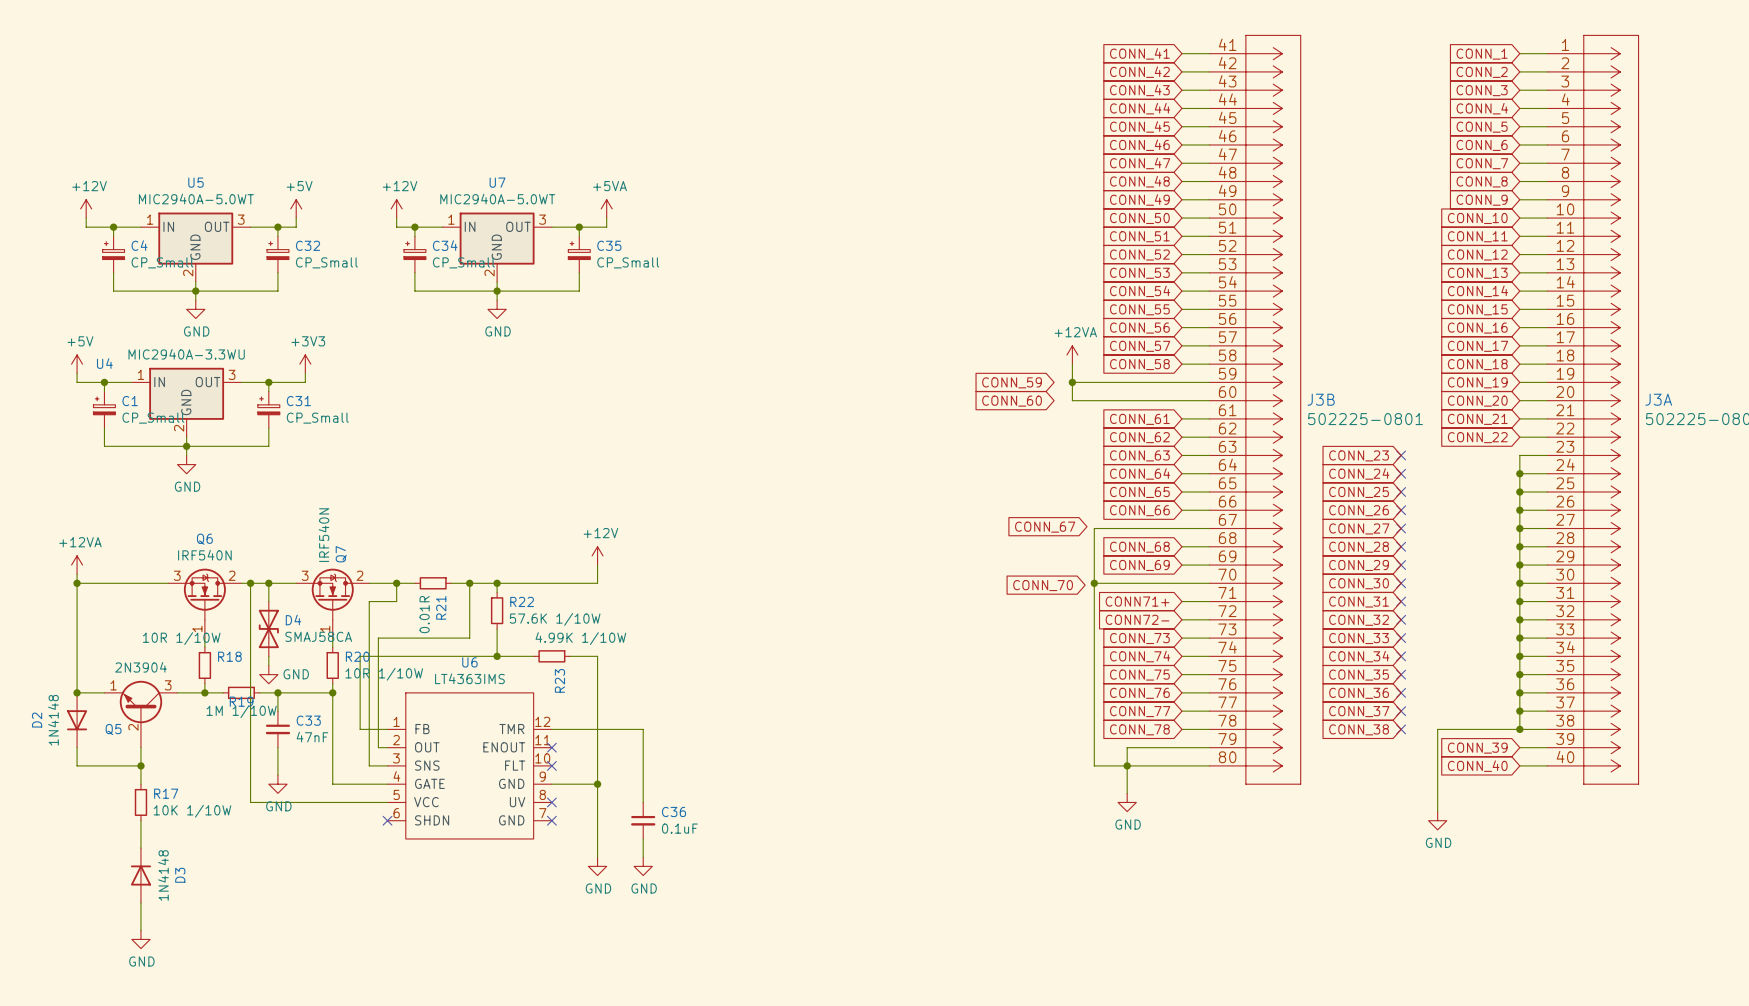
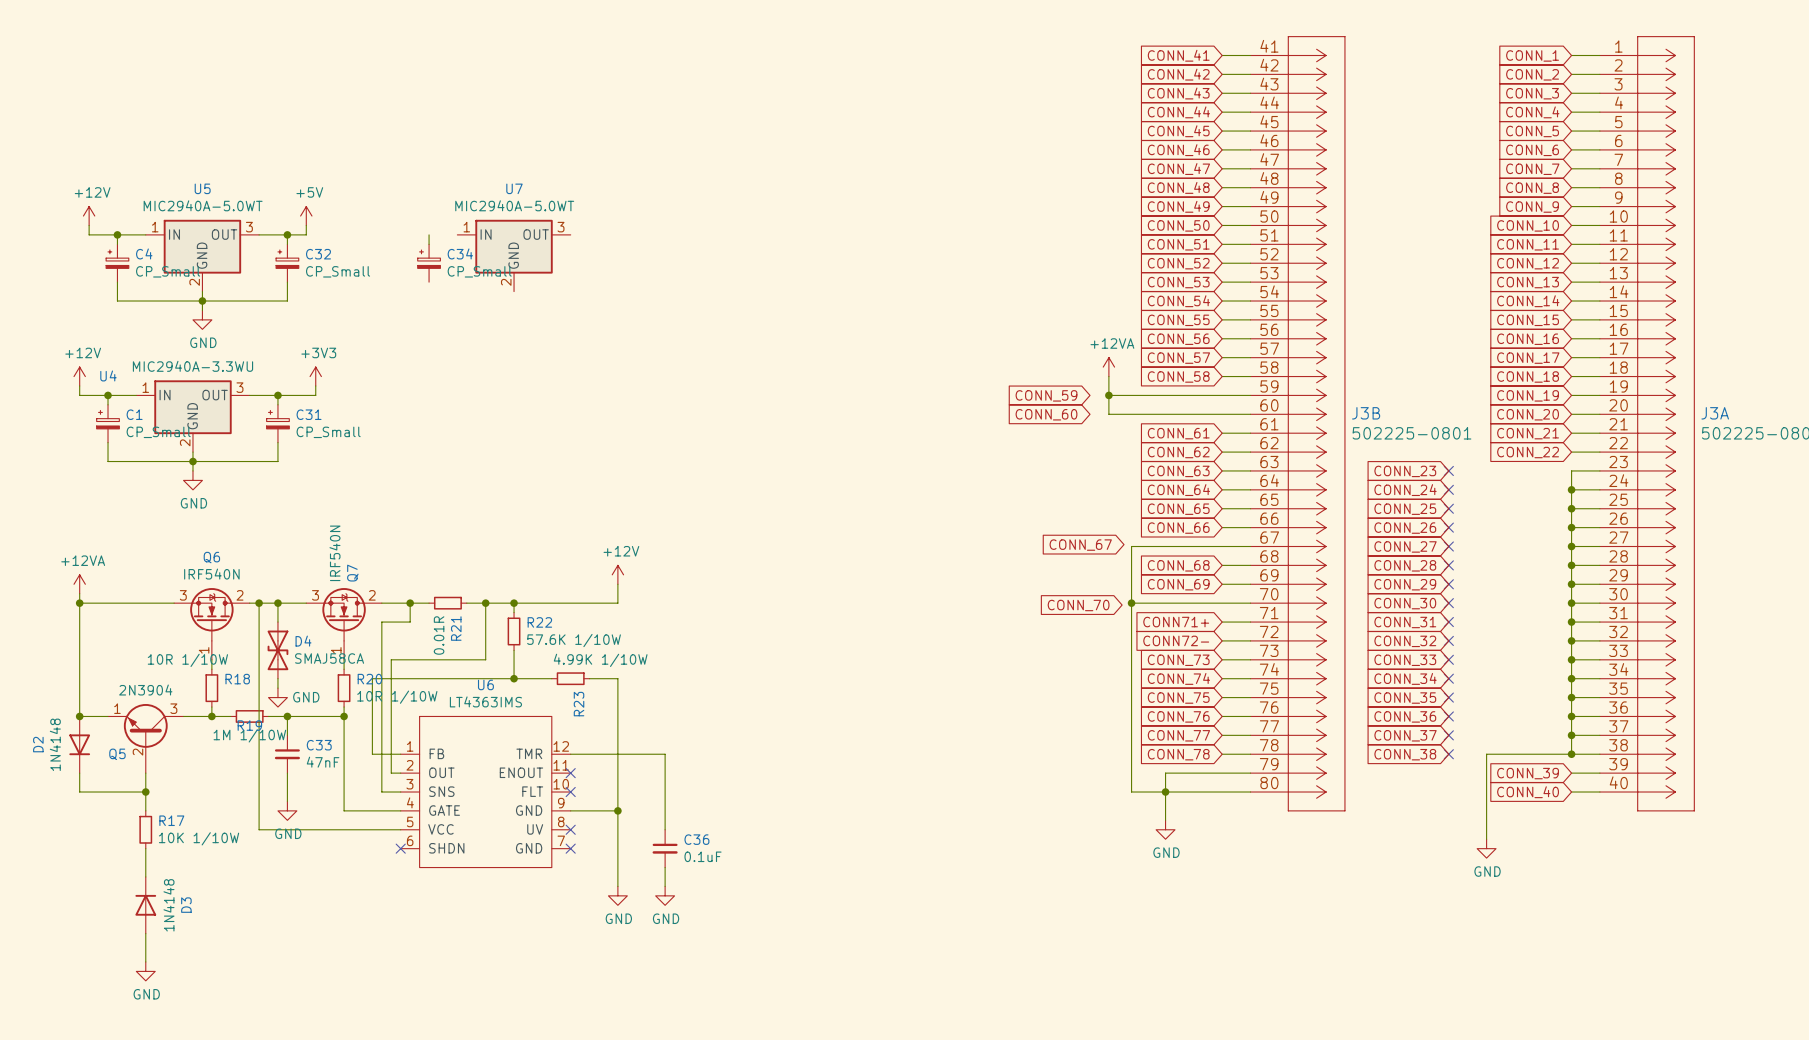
power symbol: +12V (396, 208) -> none
power symbol: +5VA (606, 208) -> none
wire: (396, 218) (396, 227) (442, 227) -> none
wire: (606, 218) (606, 227) (551, 227) -> none
junction: (414, 227) -> none
wire: (579, 227) (579, 236) -> none
junction: (579, 227) -> none
C35: CP_Small (579, 254) -> none
wire: (414, 272) (414, 291) (579, 291) (579, 272) -> none
wire: (497, 281) (497, 300) -> none
junction: (497, 291) -> none
power symbol: GND (497, 309) -> none
power symbol: +5V (77, 364) -> +12V (79, 376)

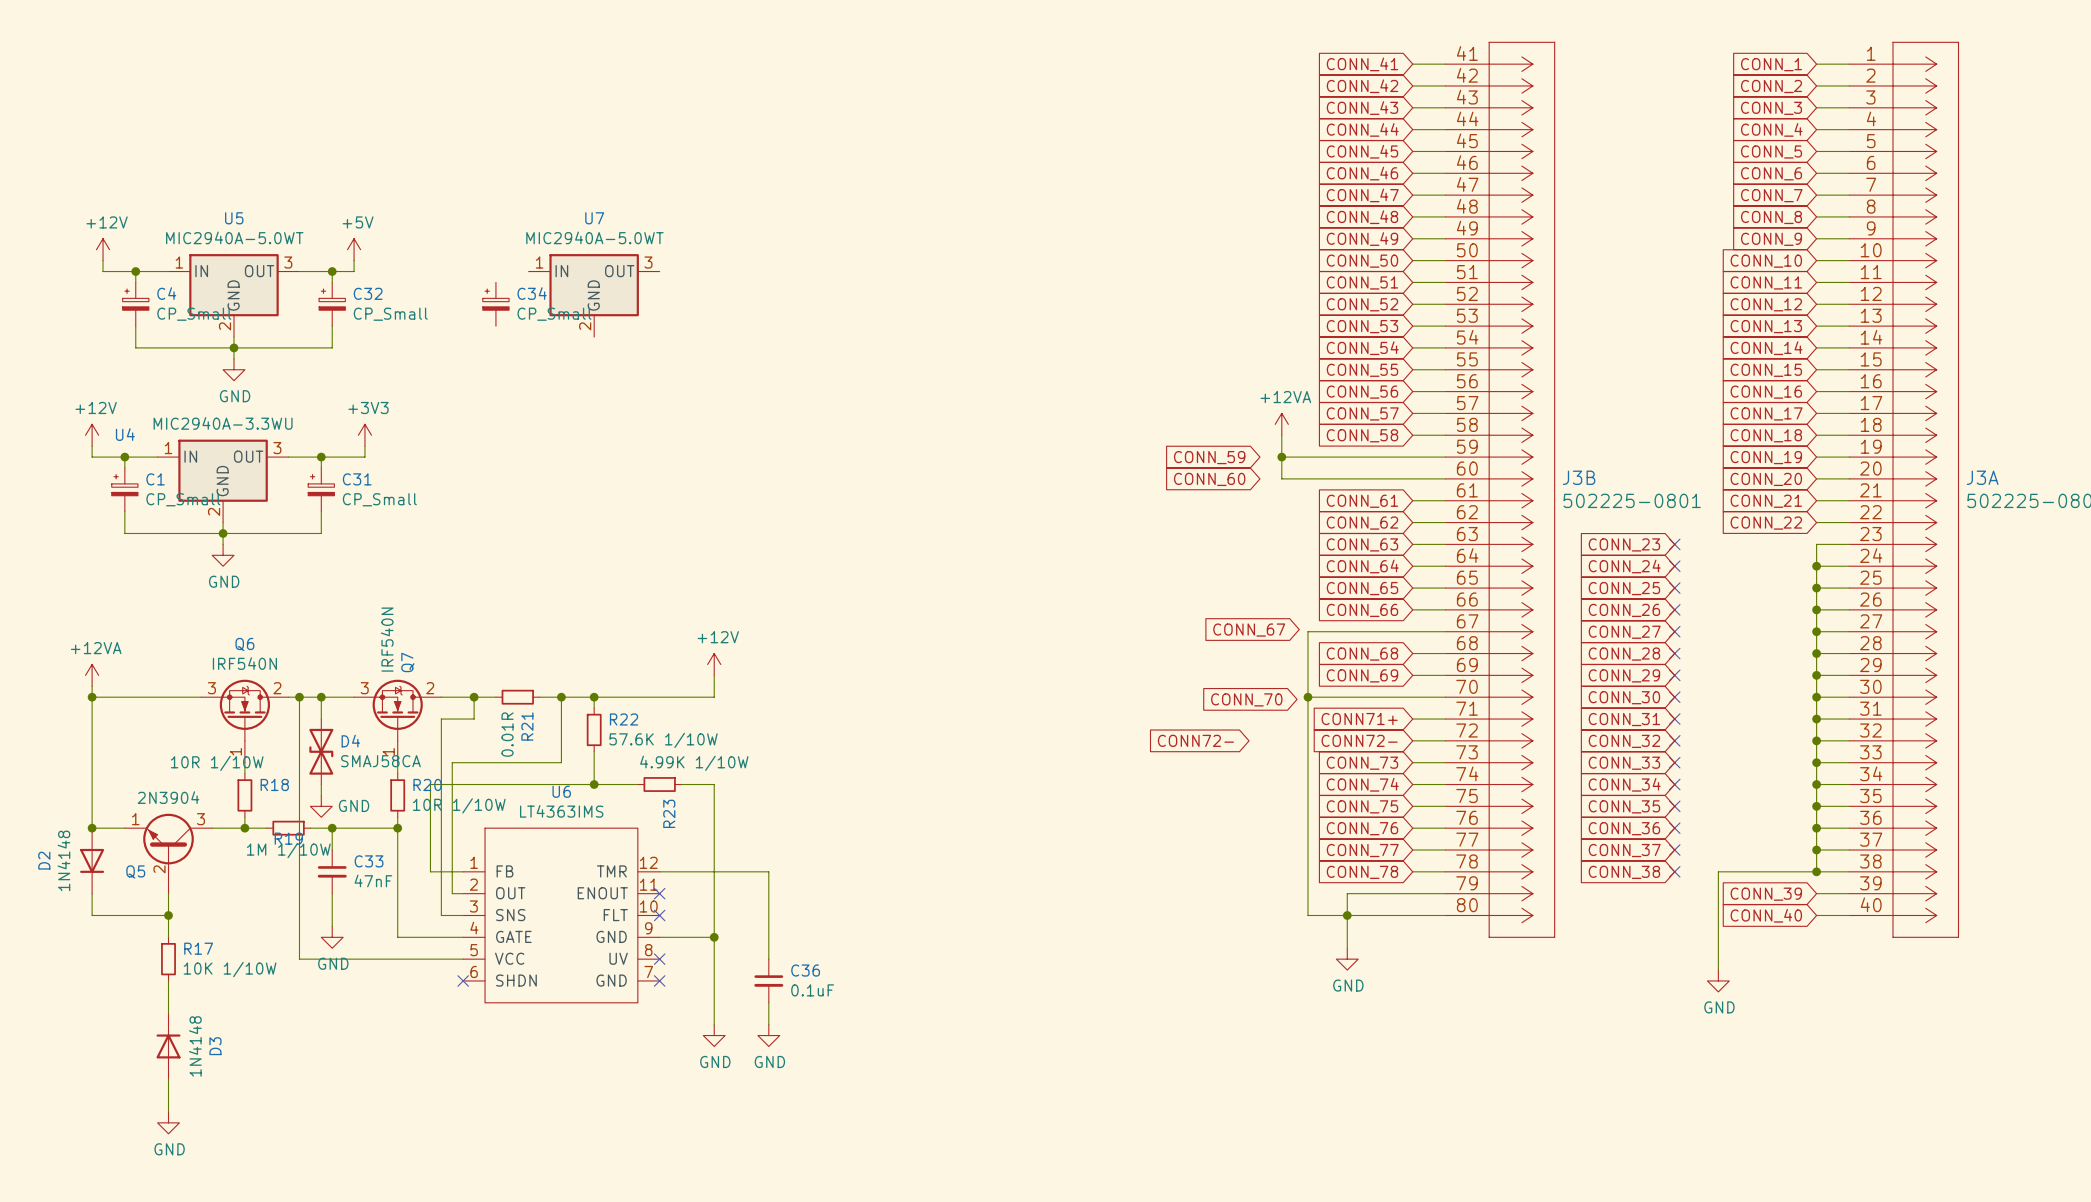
wire: (429, 234) (429, 244) -> none
global label: none -> CONN72- (1195, 740)

